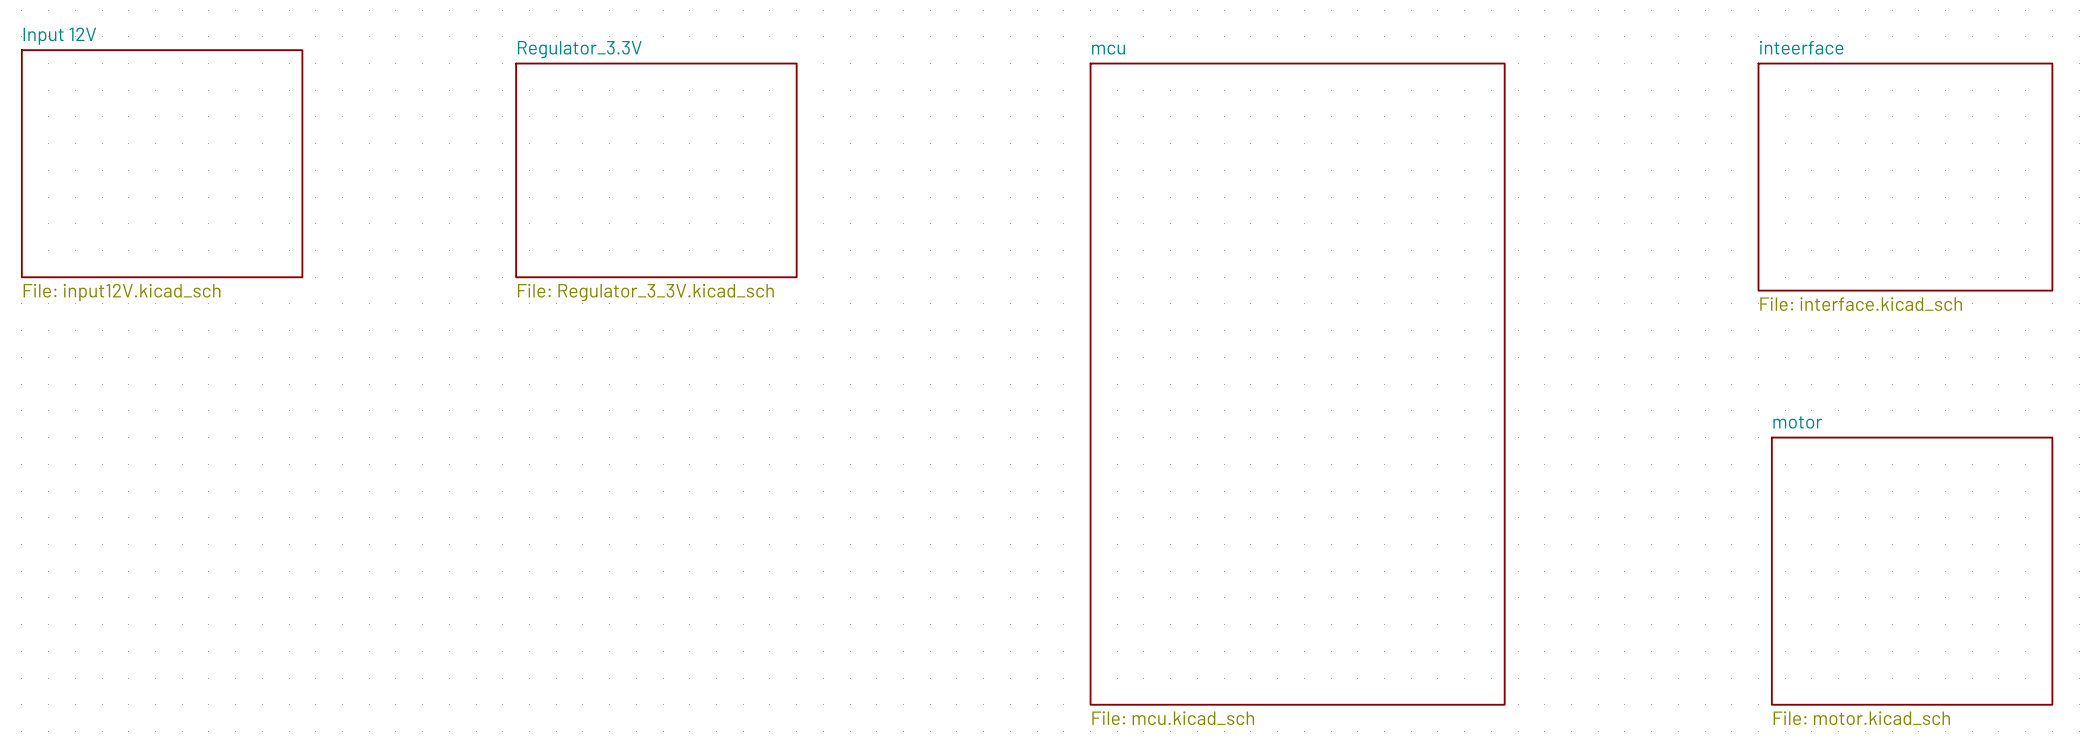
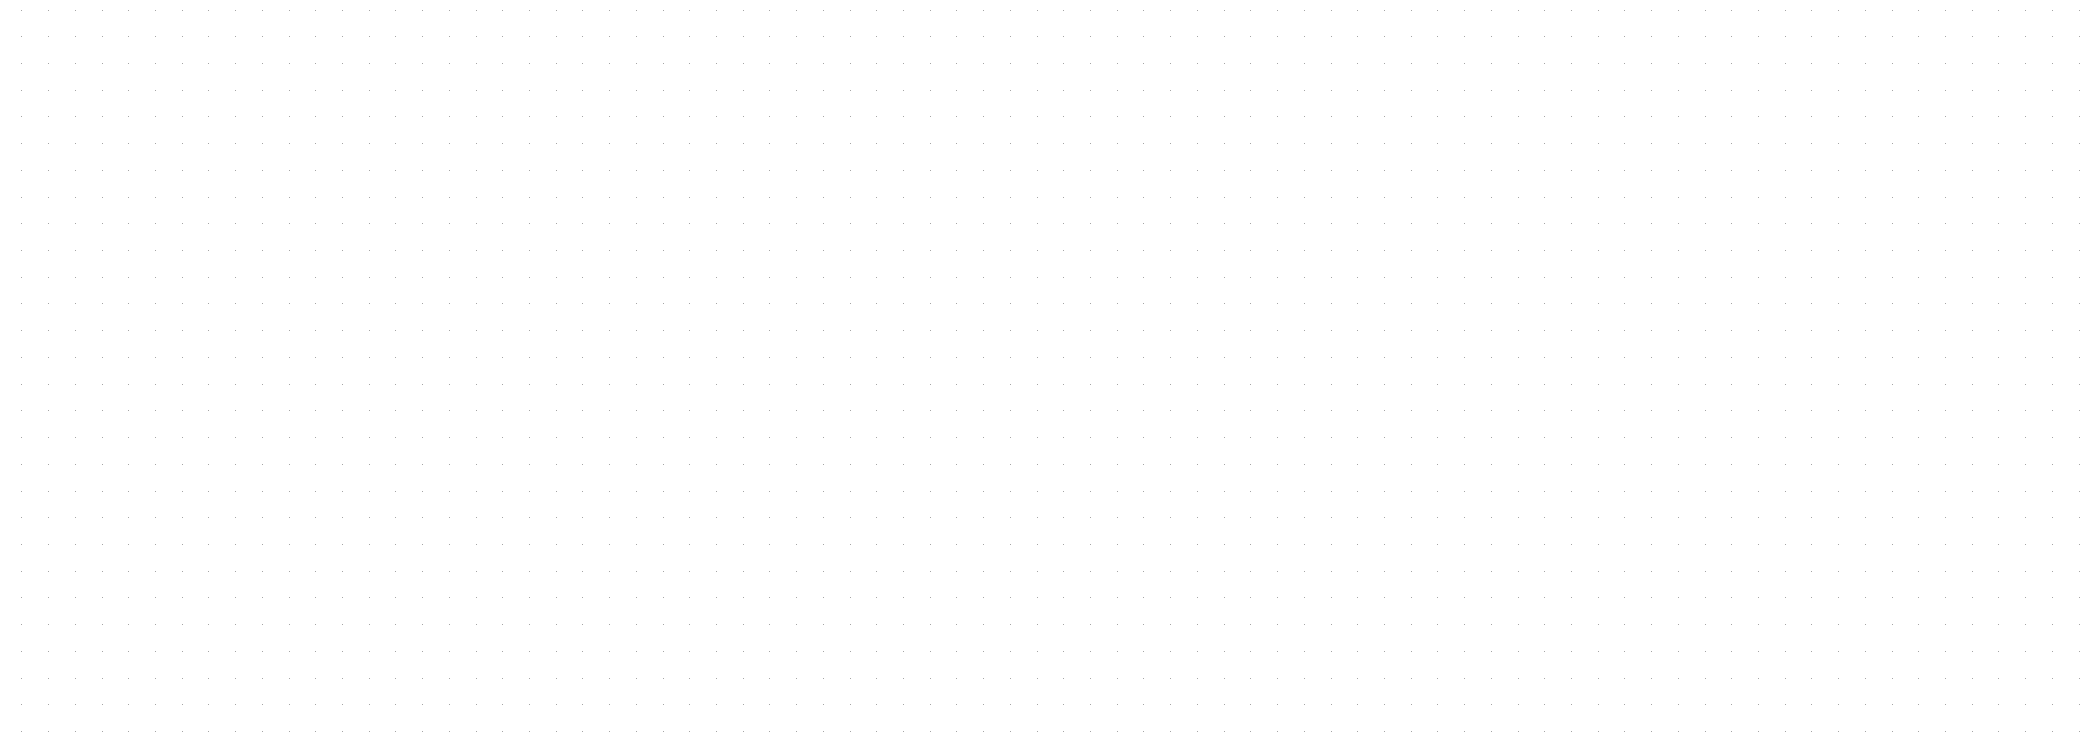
sheet Input 12V: File: input12V.kicad_sch (162, 163) -> none
sheet Regulator_3.3V: File: Regulator_3_3V.kicad_sch (656, 170) -> none
sheet inteerface: File: interface.kicad_sch (1905, 177) -> none
sheet mcu: File: mcu.kicad_sch (1297, 384) -> none
sheet motor: File: motor.kicad_sch (1912, 571) -> none

